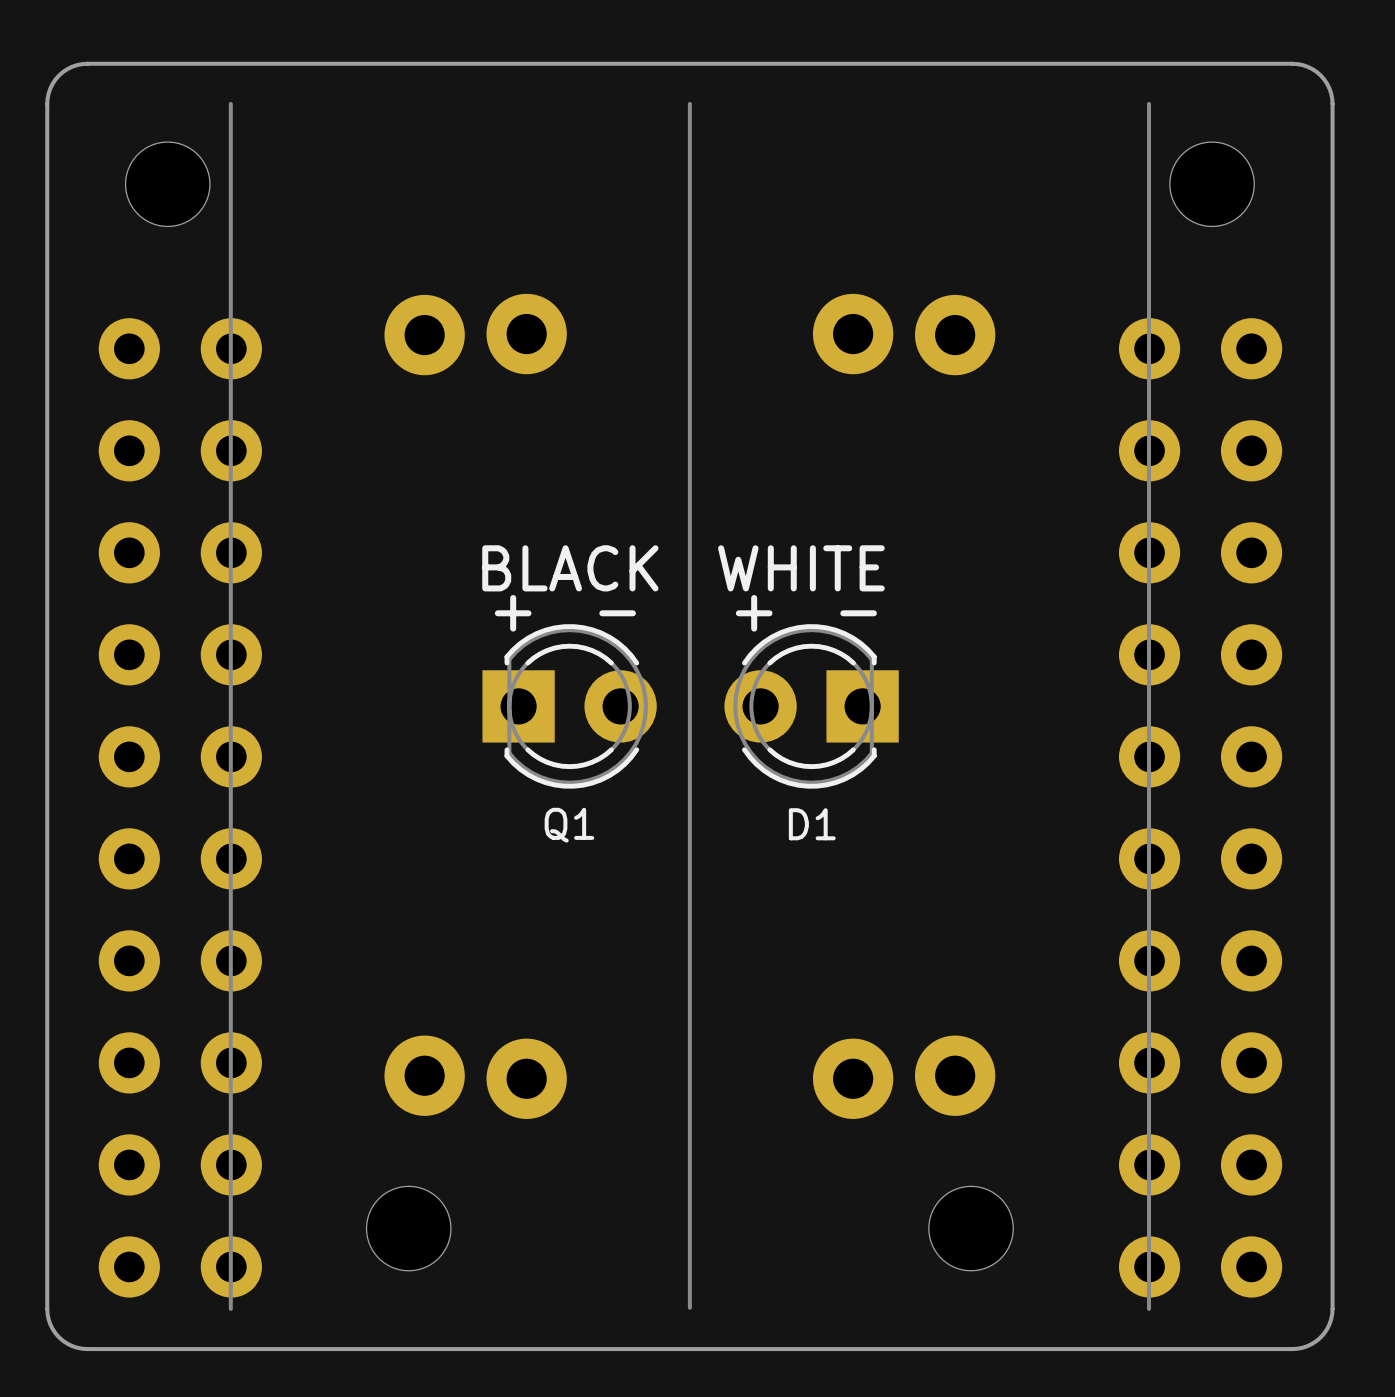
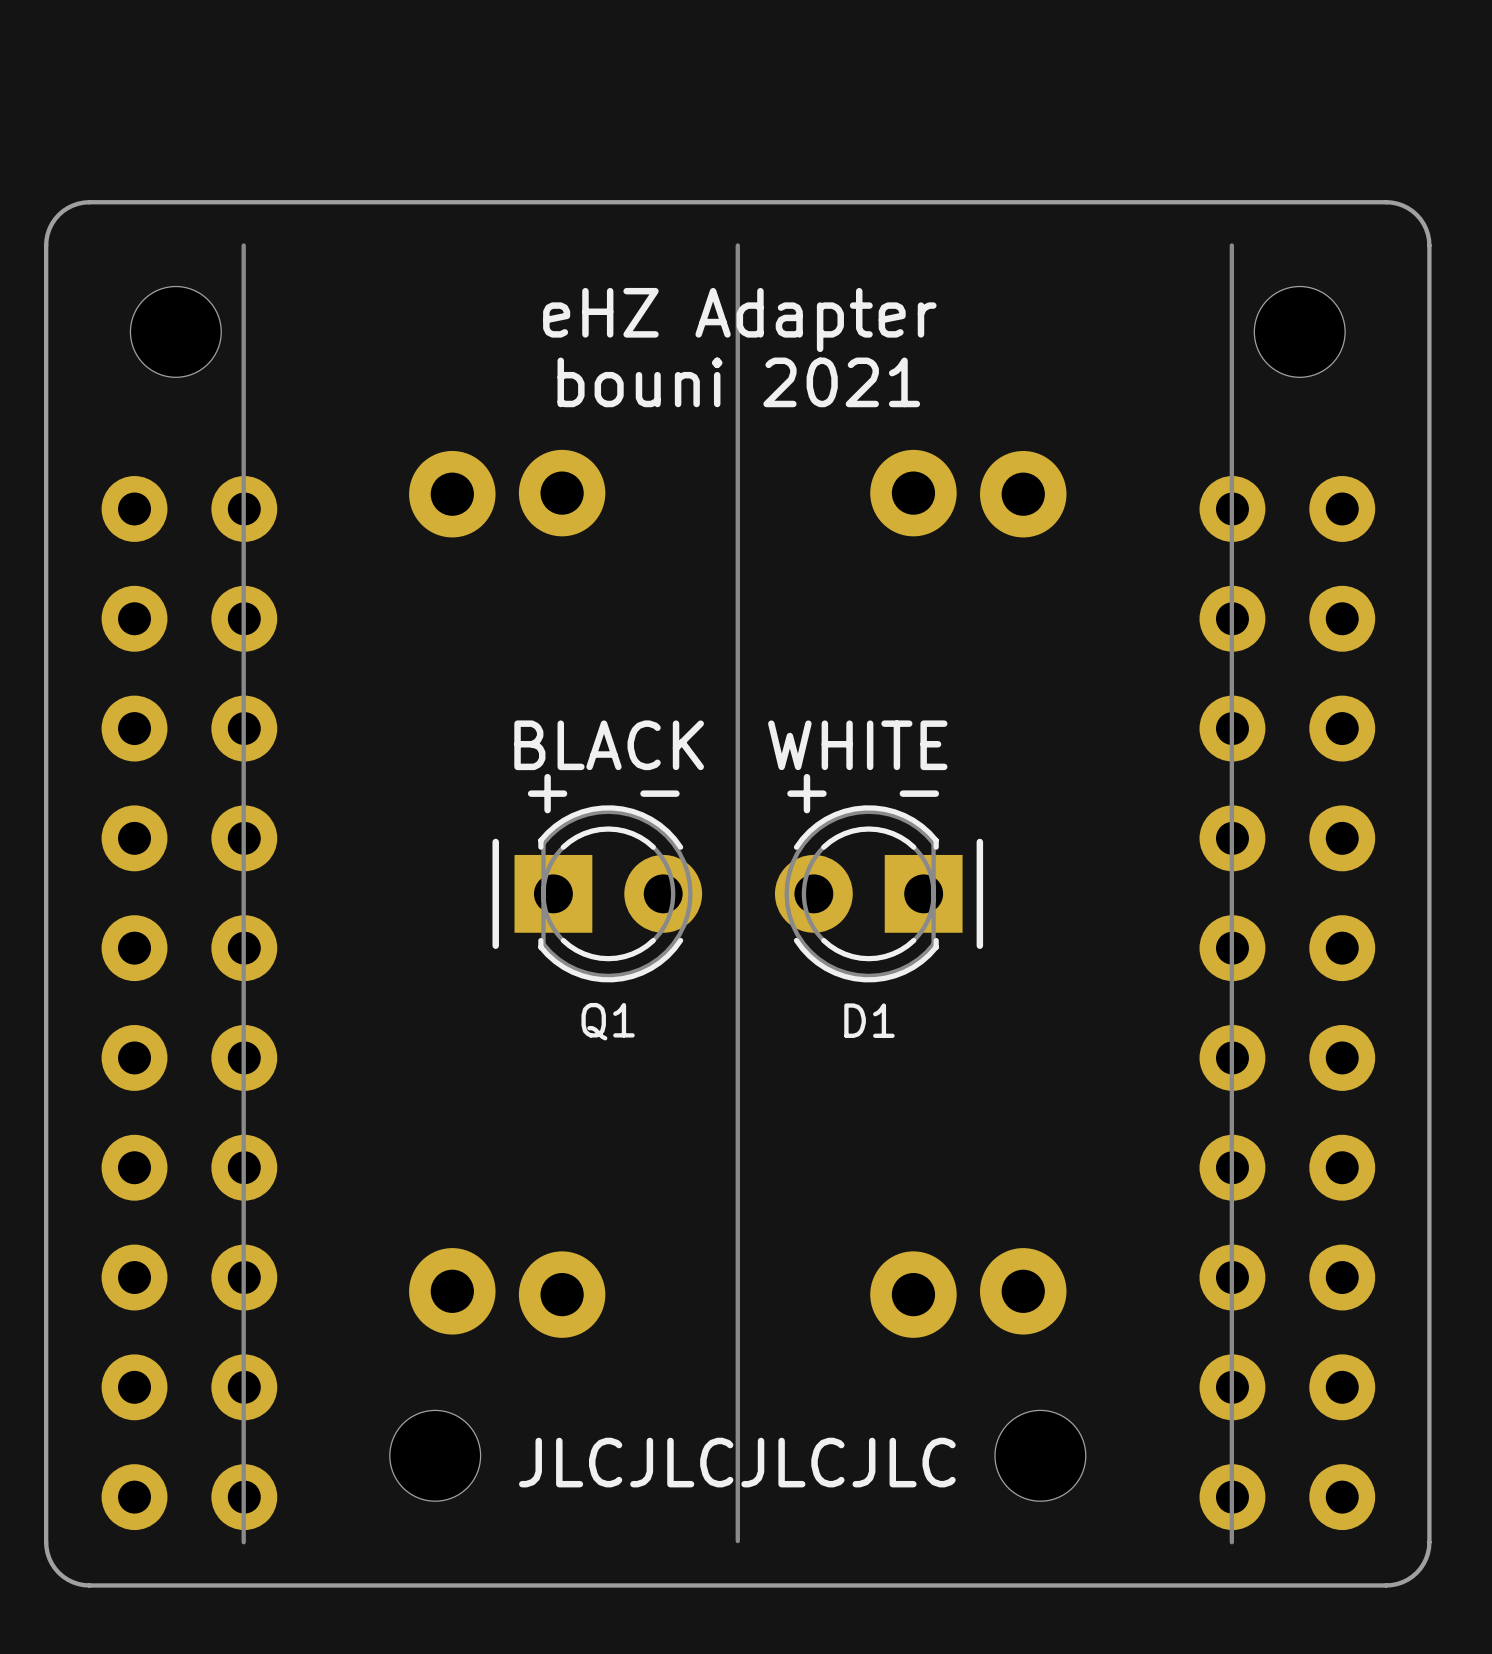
text: none -> eHZ Adapter (739, 319)
text: none -> bouni 2021 (738, 382)
line: none -> (495, 841) (495, 945)
line: none -> (979, 841) (979, 945)
text: none -> JLCJLCJLCJLC (737, 1462)

